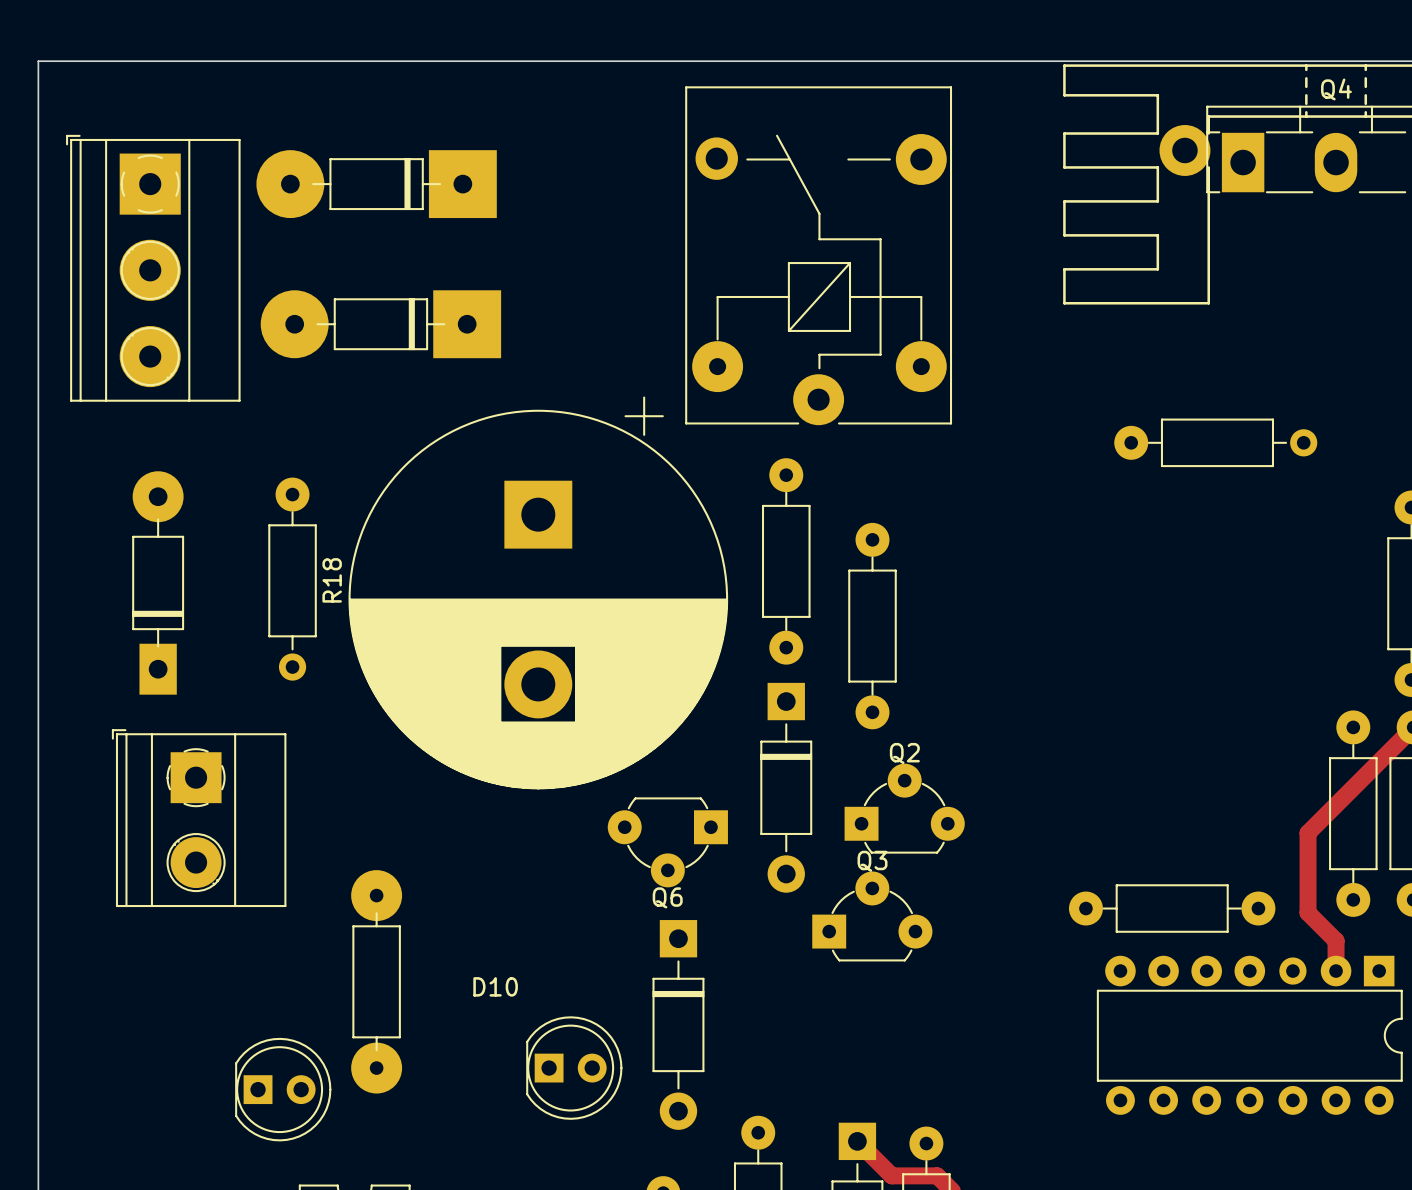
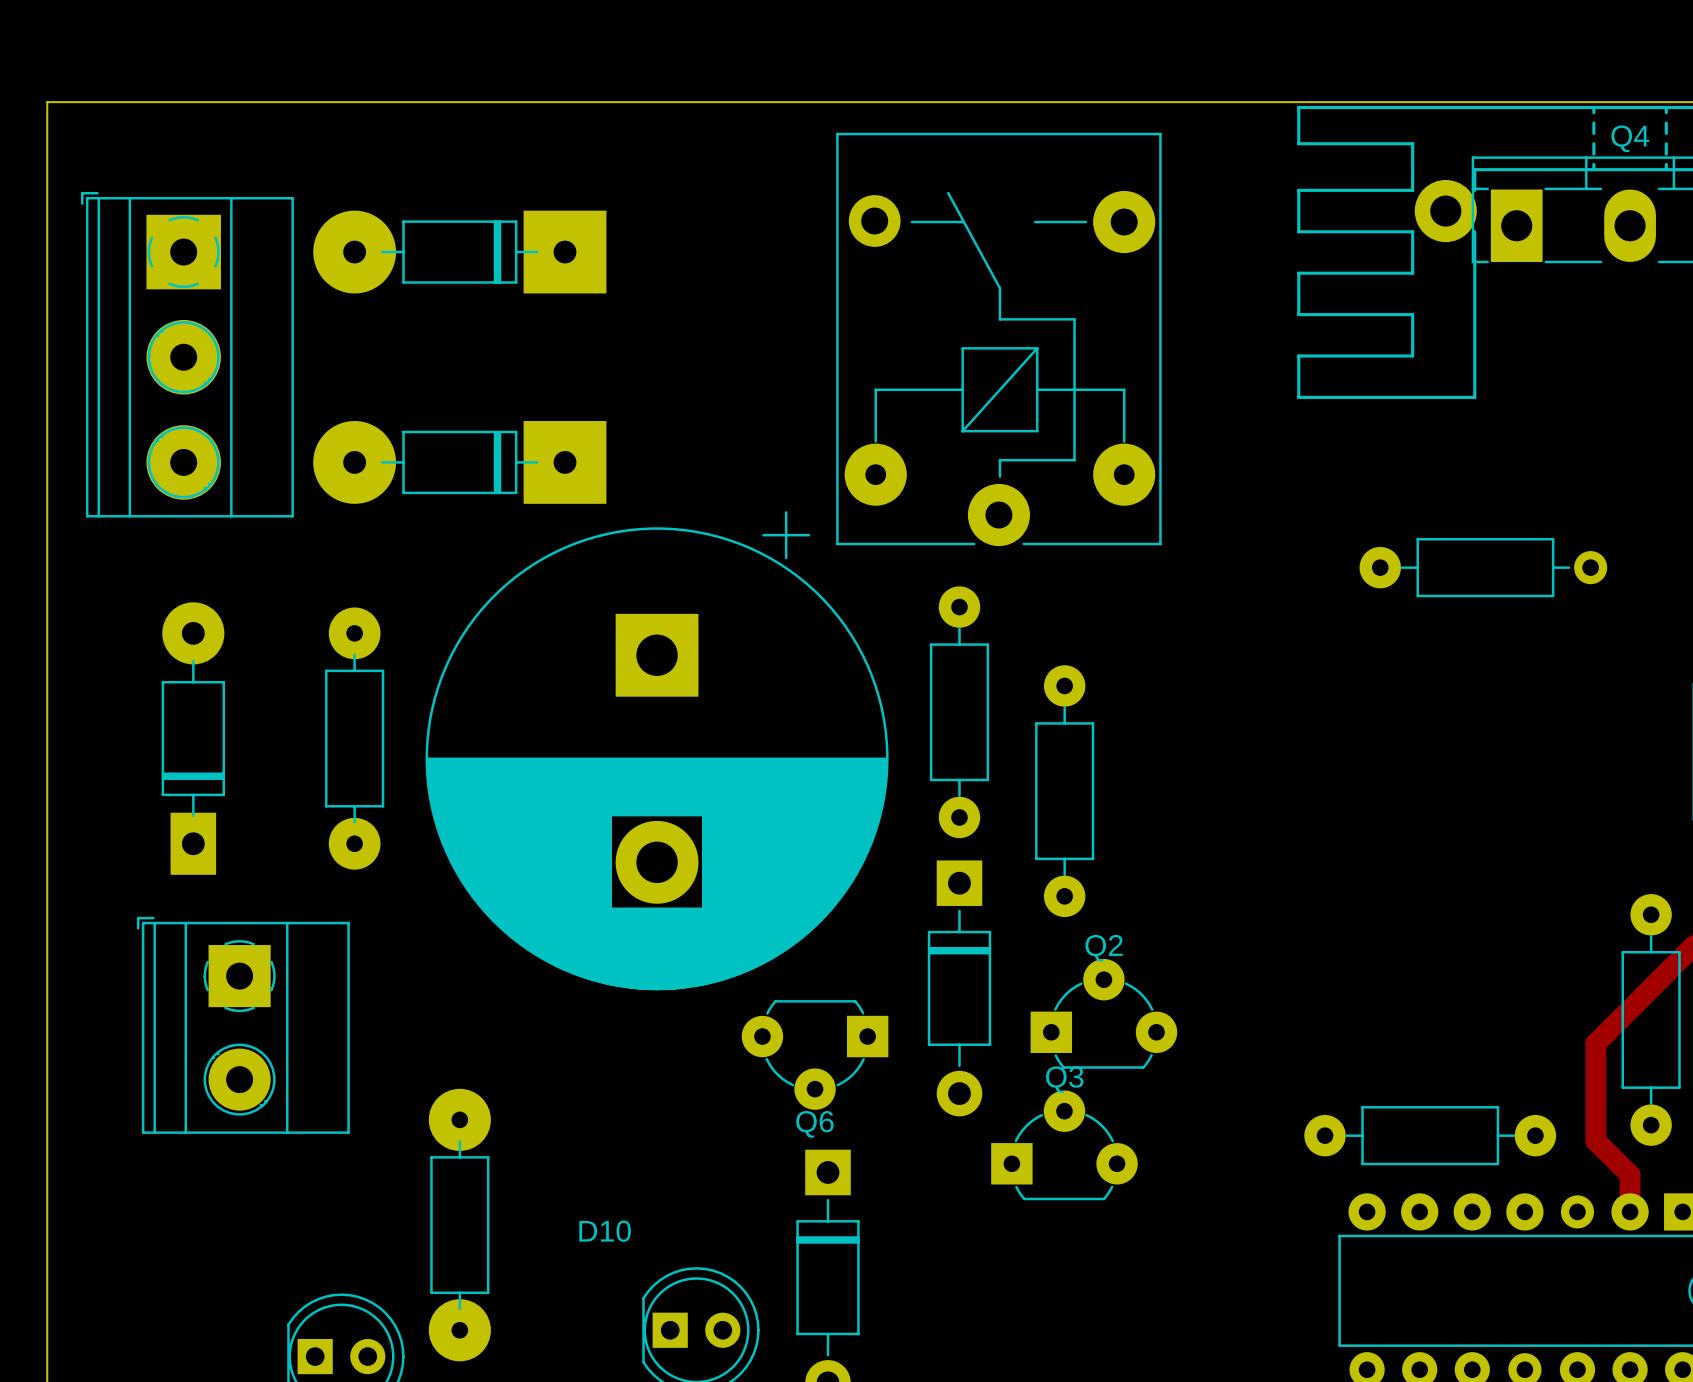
part position: (380, 324) -> (459, 462)
R18: (292, 579) -> none
part: none -> (354, 738)

